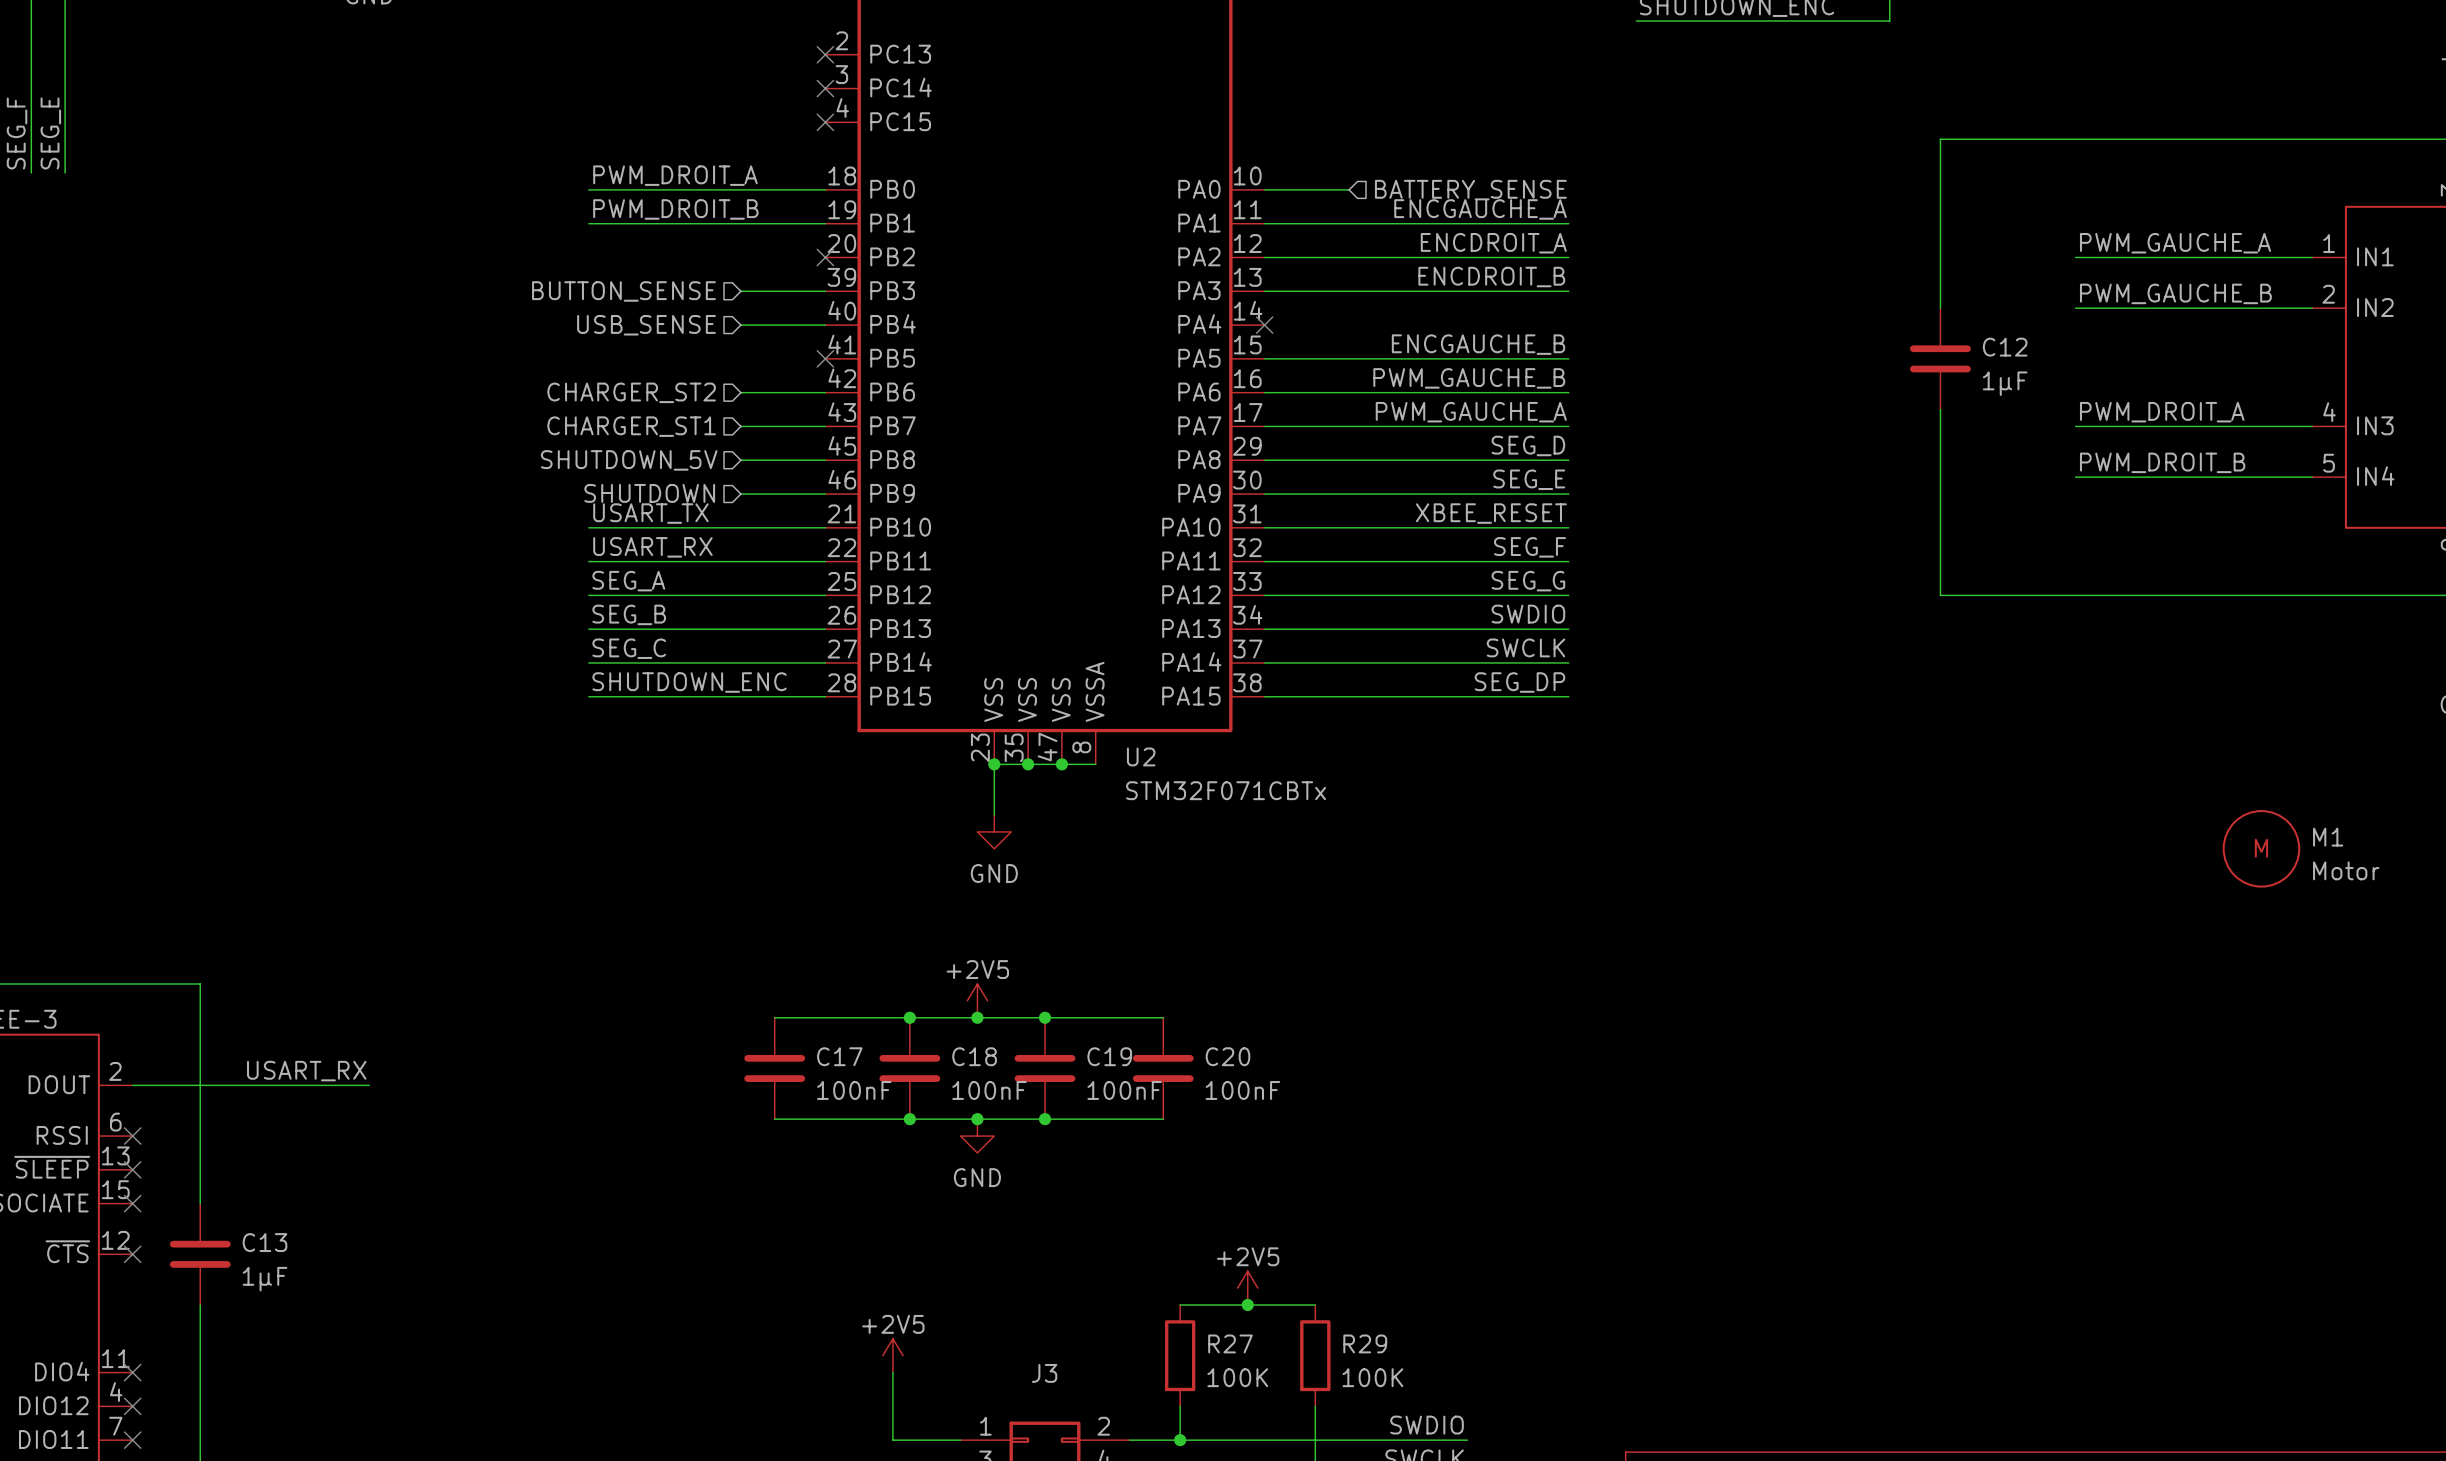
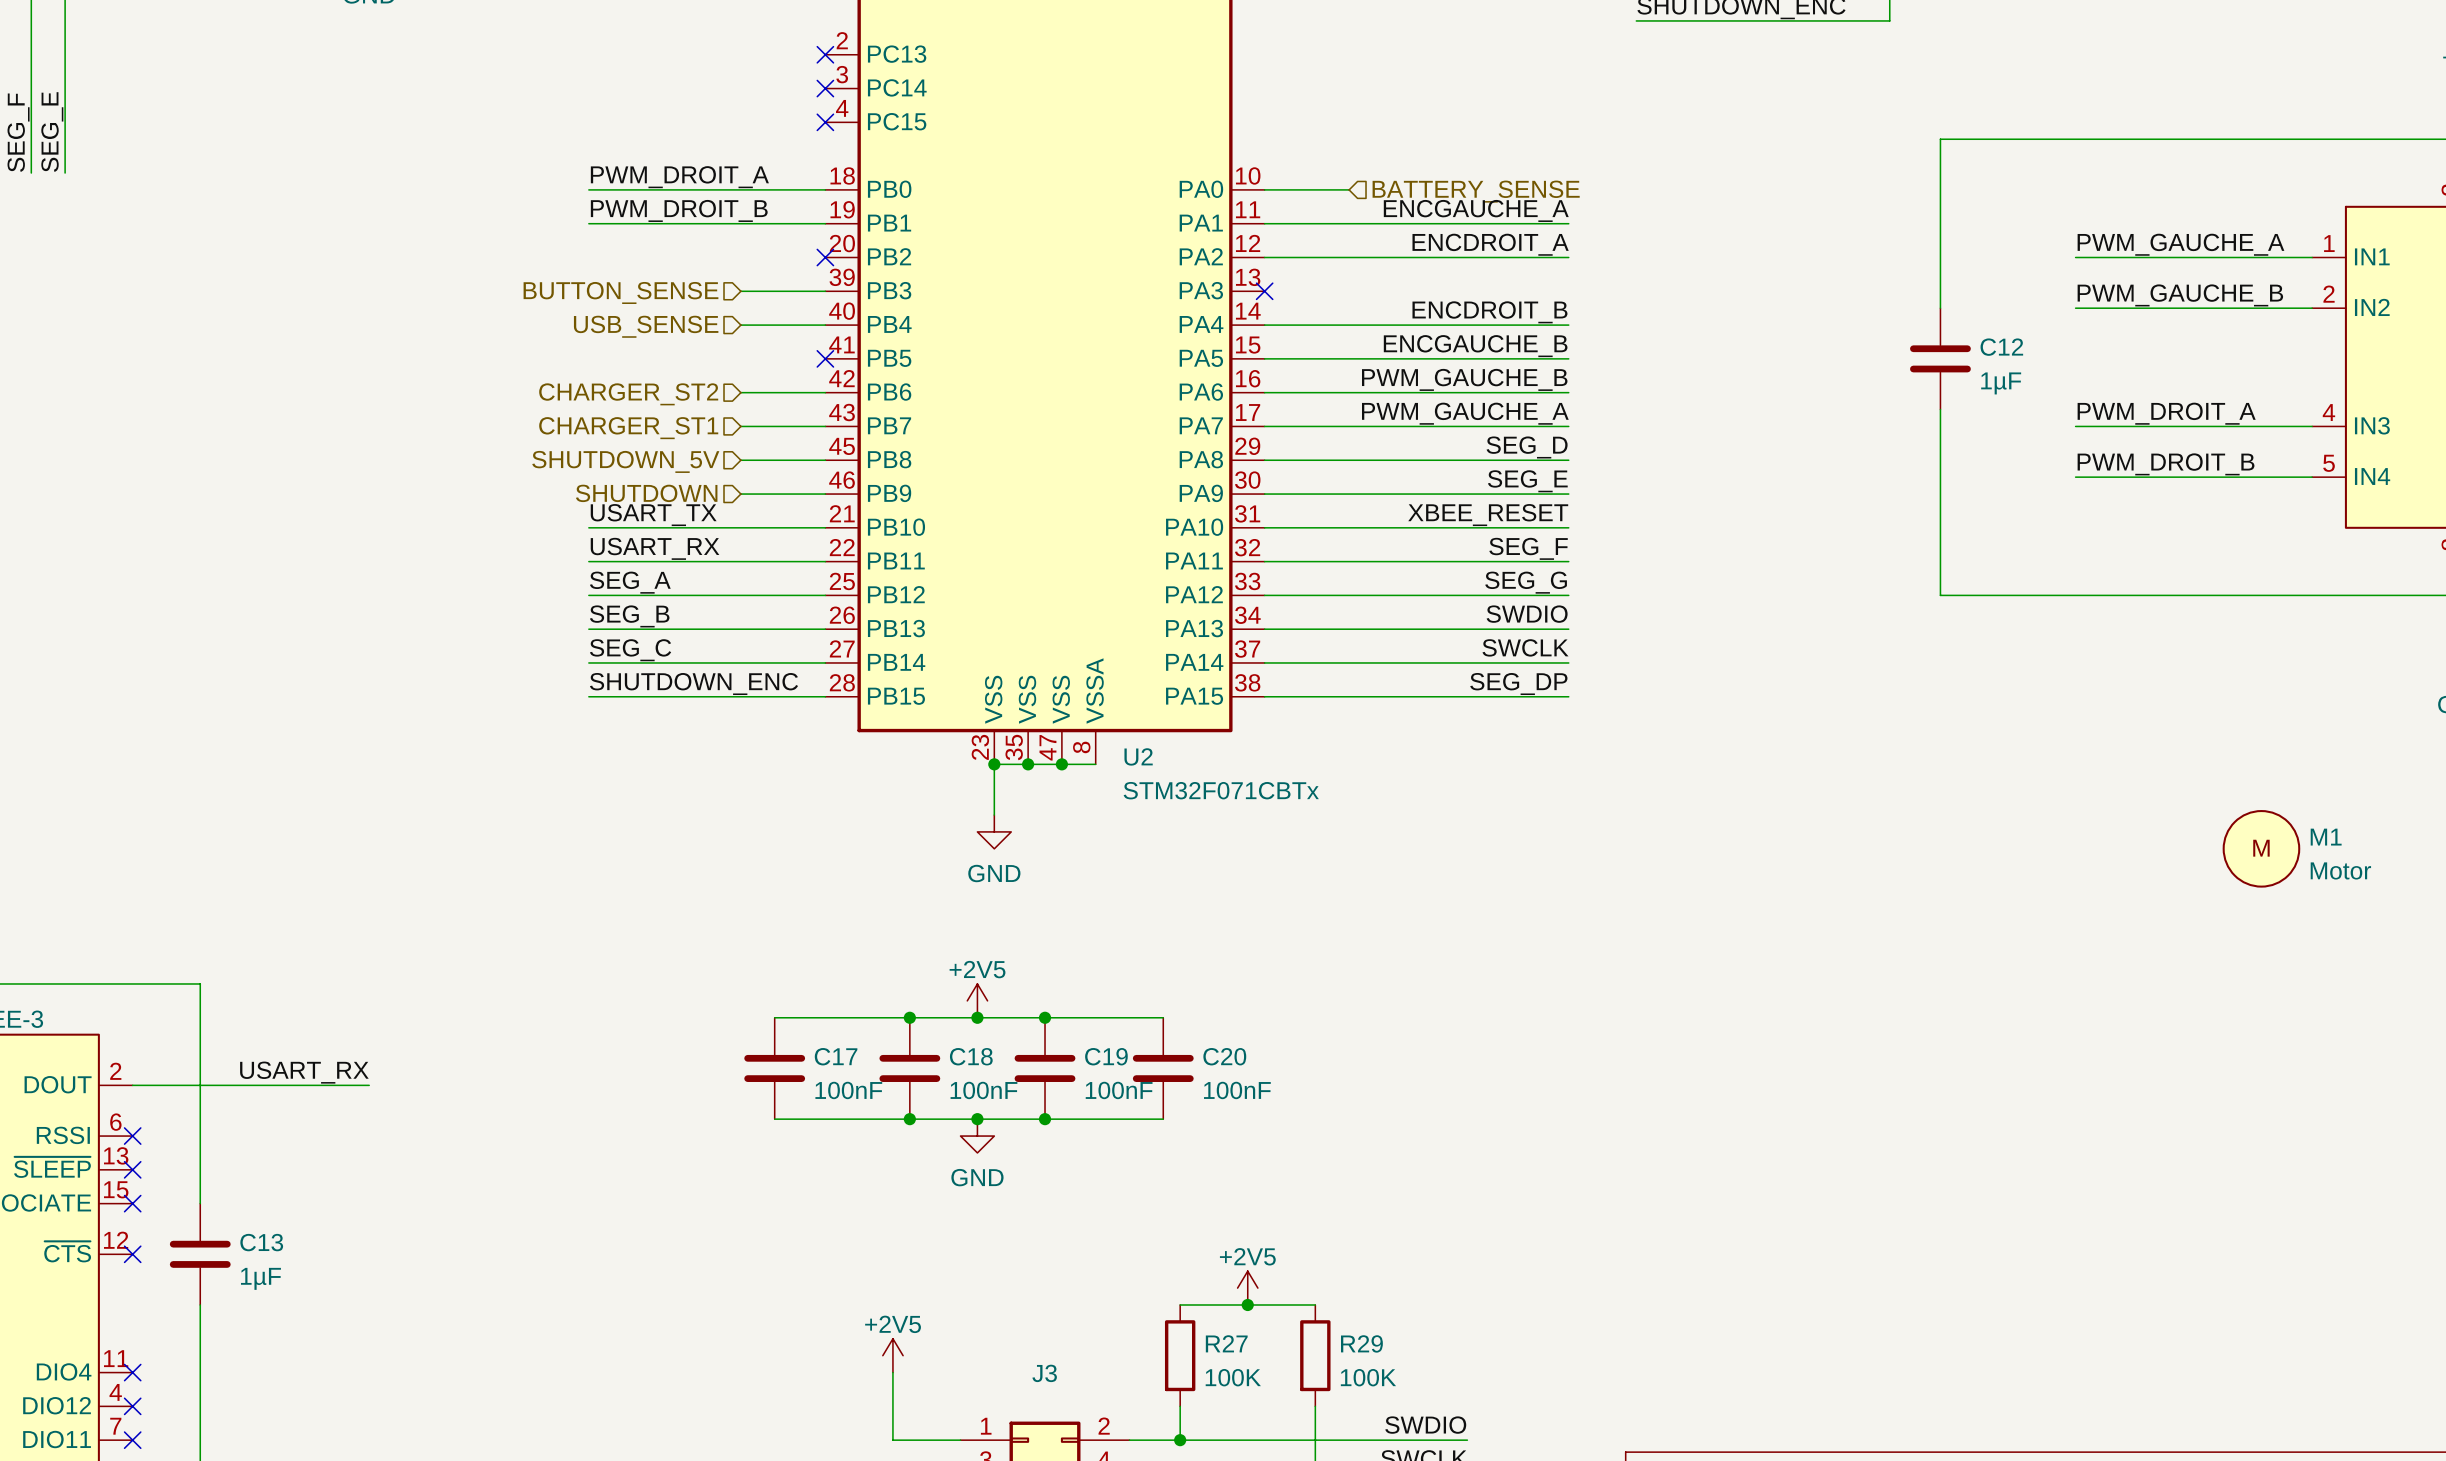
label position: ENCDROIT_B (1491, 277) -> ENCDROIT_B (1489, 312)
wire: (1264, 291) (1568, 291) -> (1264, 325) (1568, 325)
no-connect mark position: (1264, 325) -> (1264, 291)

